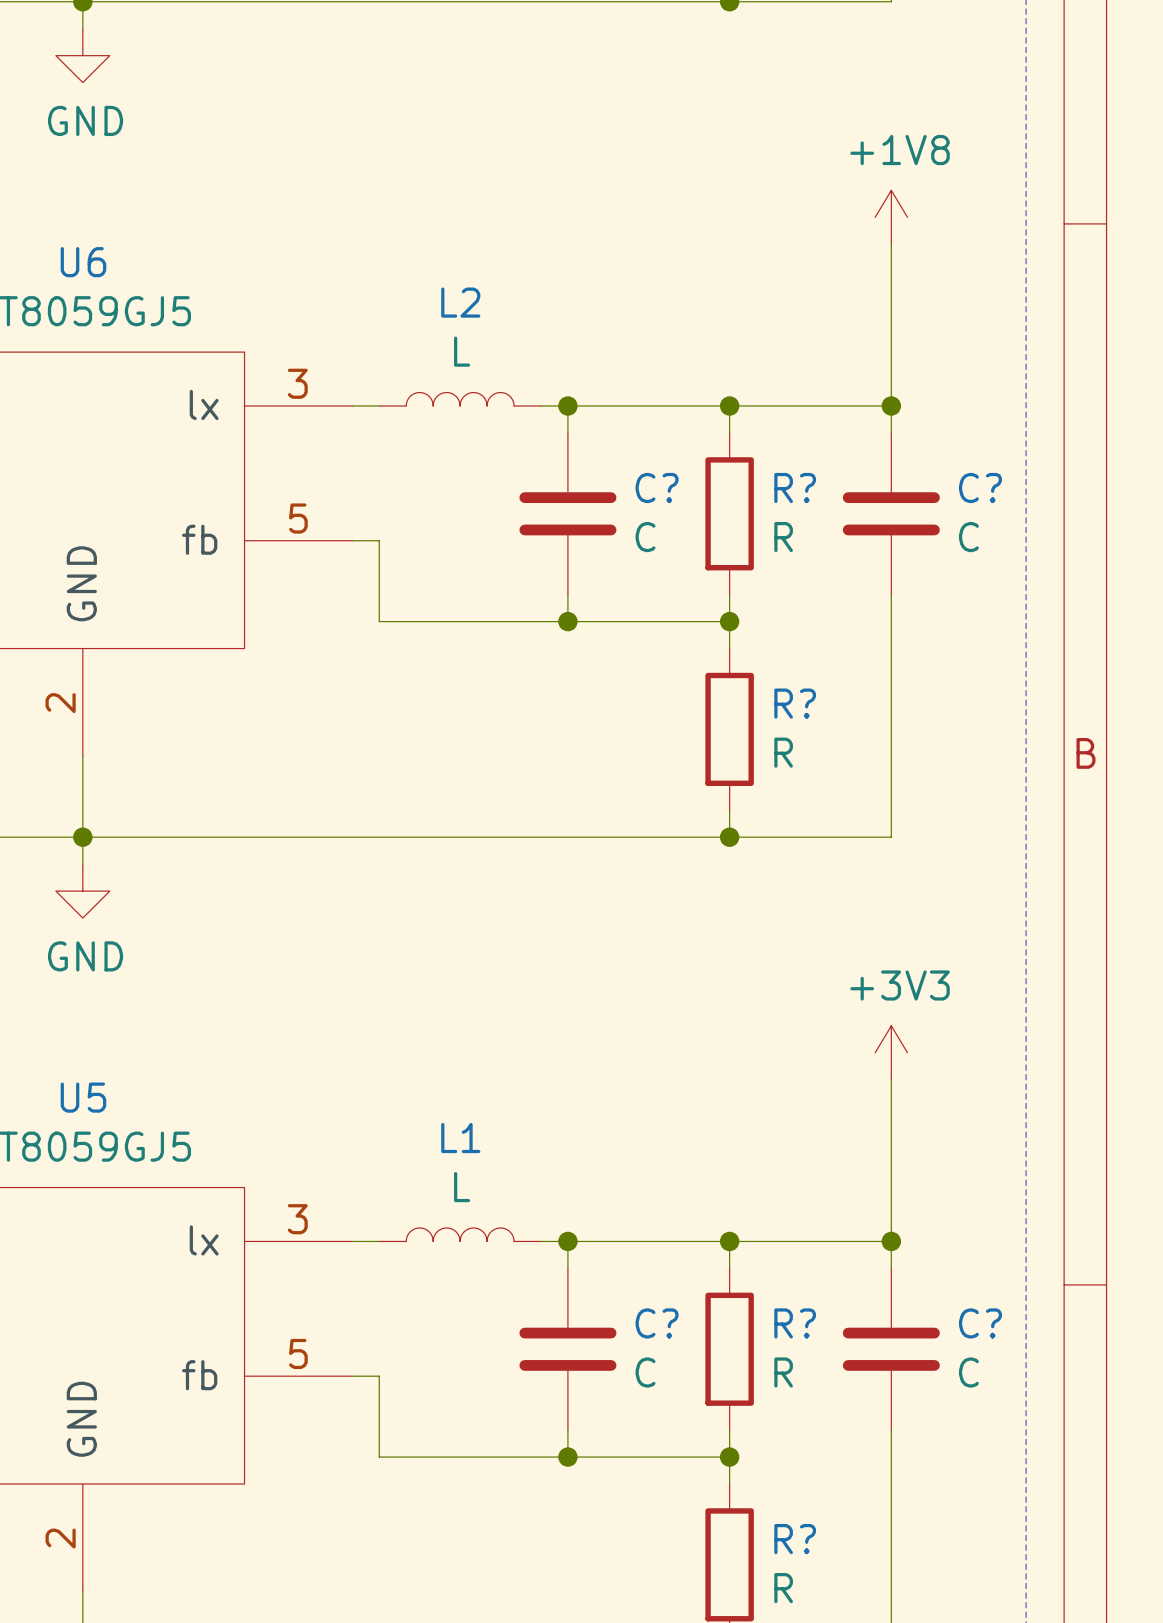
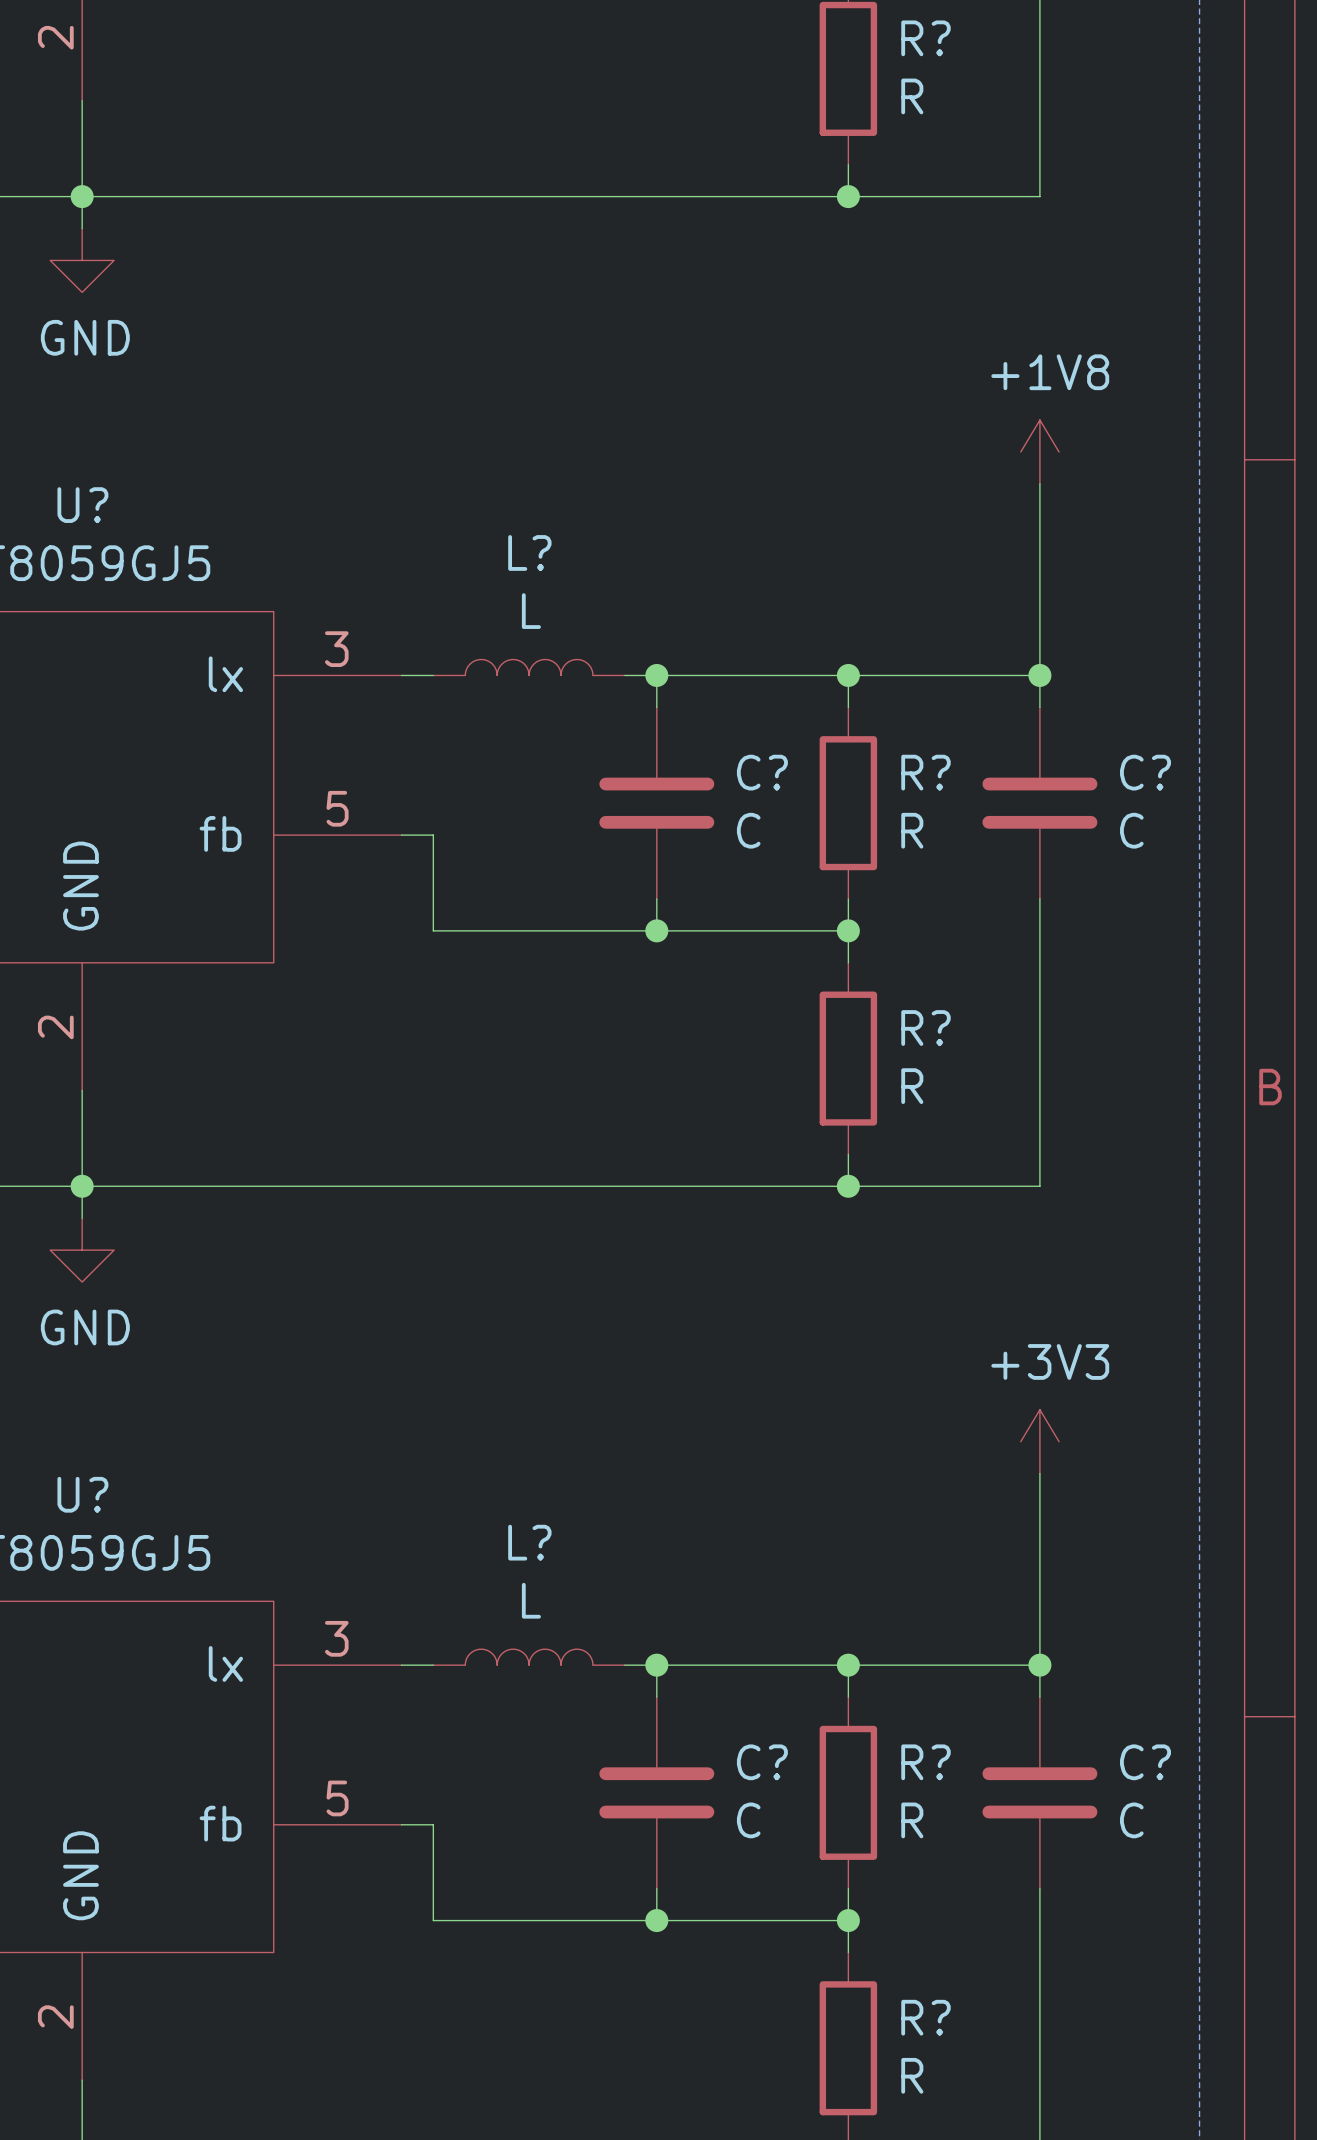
U6 name: U6 (83, 262) -> U? (82, 505)
L2 name: L2 (460, 302) -> L? (529, 552)
U5 name: U5 (83, 1097) -> U? (82, 1494)
L1 name: L1 (460, 1138) -> L? (529, 1542)

